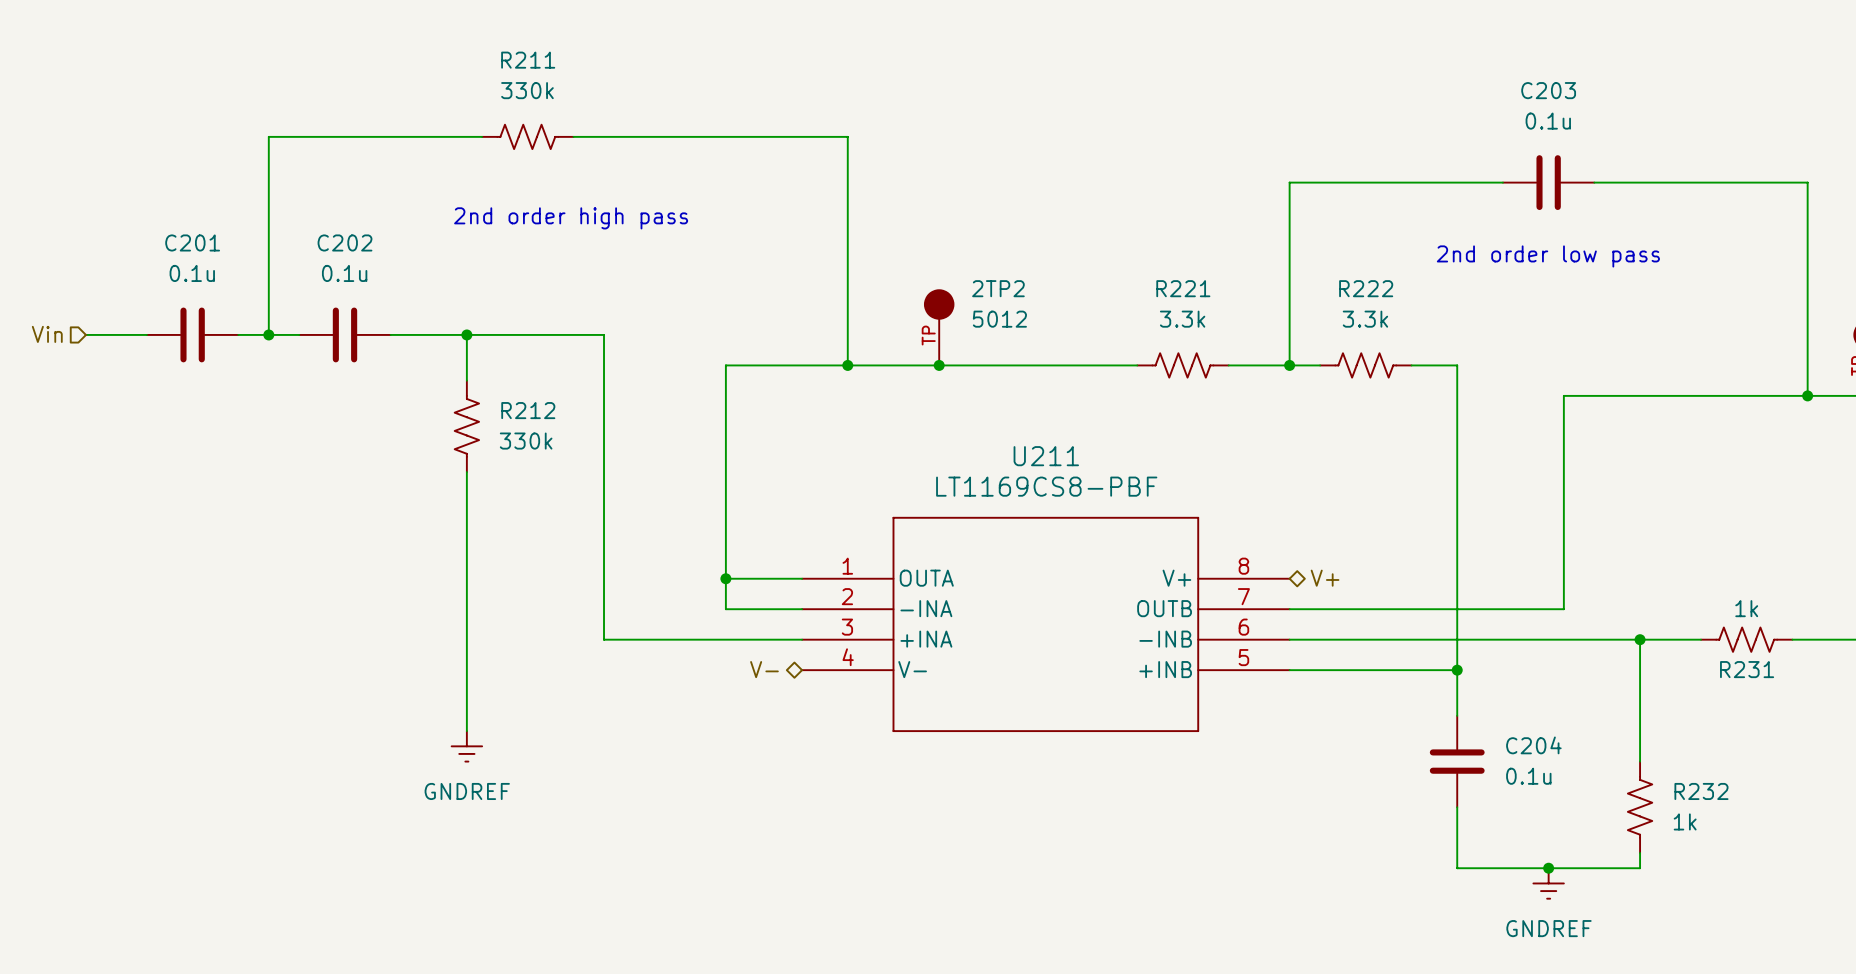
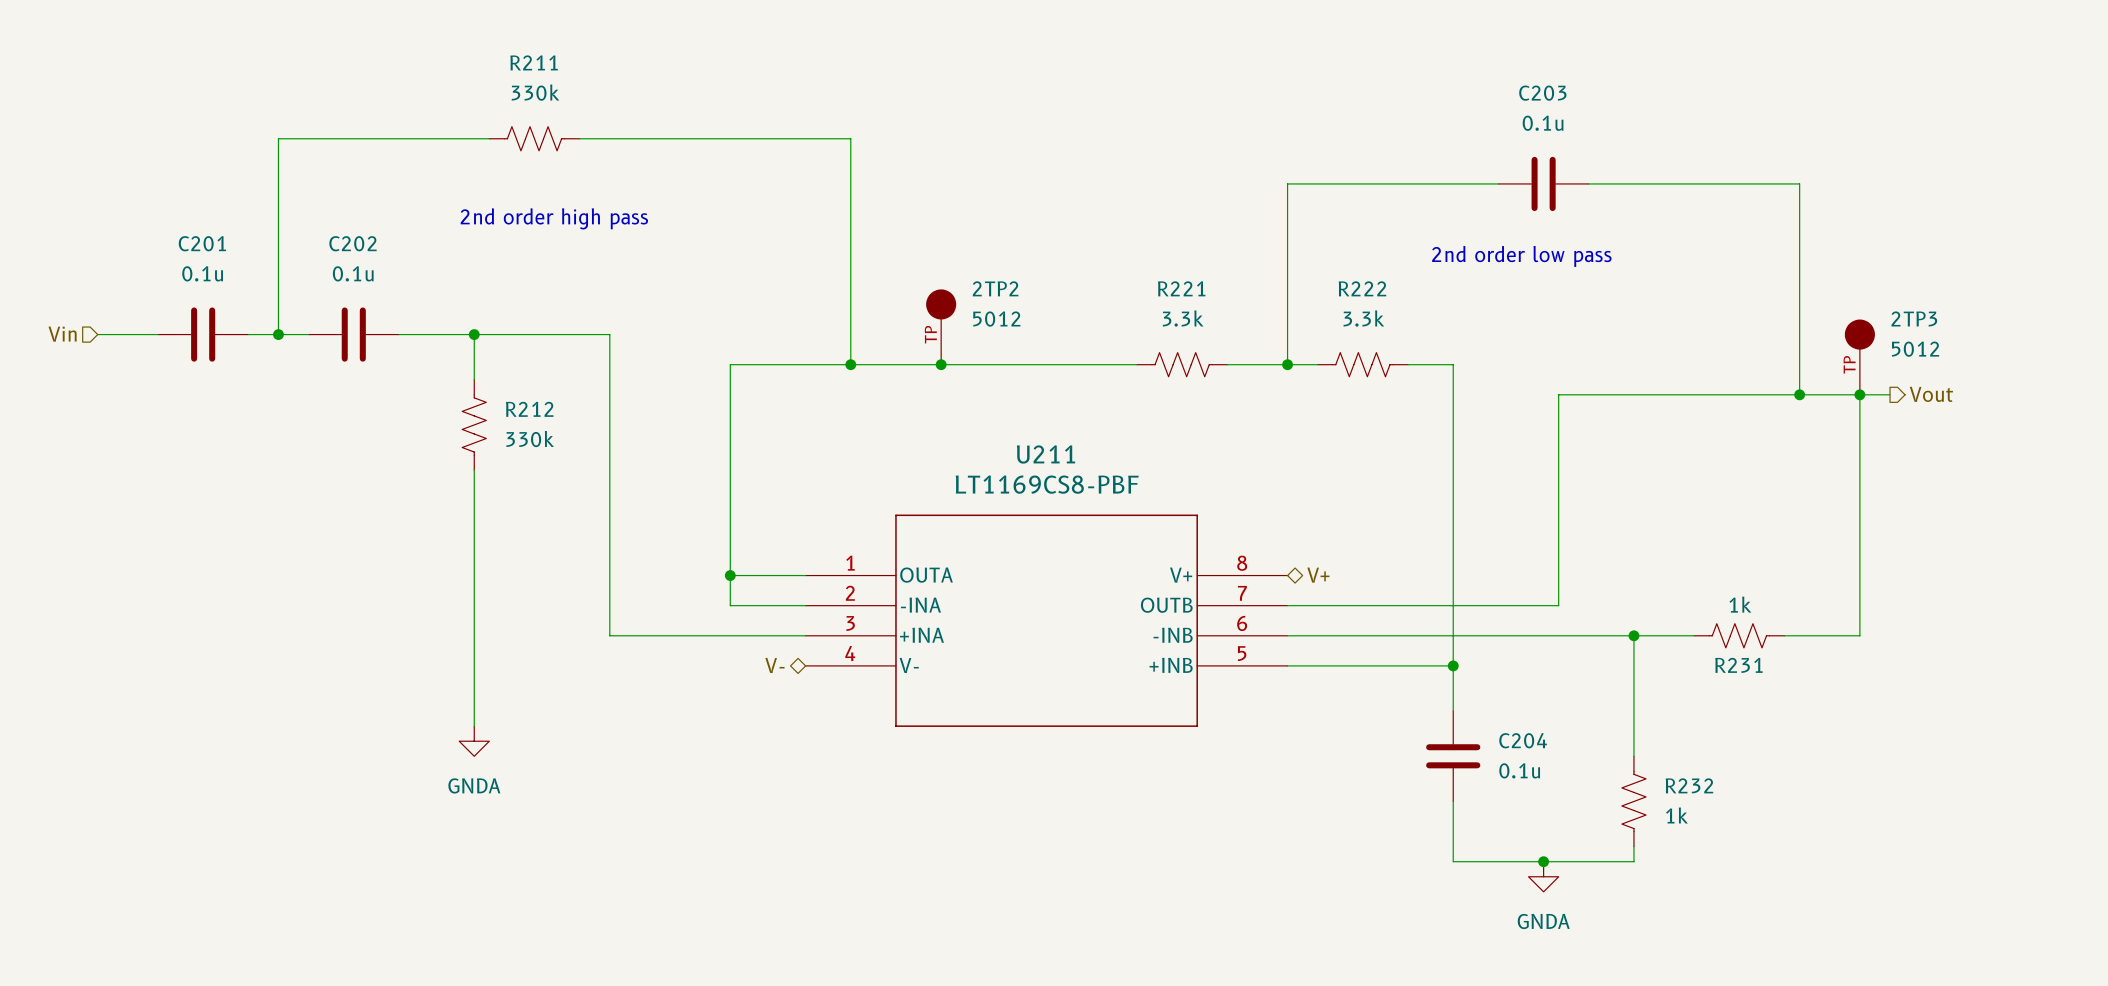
power symbol: GNDREF (466, 746) -> GNDA (474, 741)
power symbol: GNDREF (1548, 883) -> GNDA (1543, 876)

